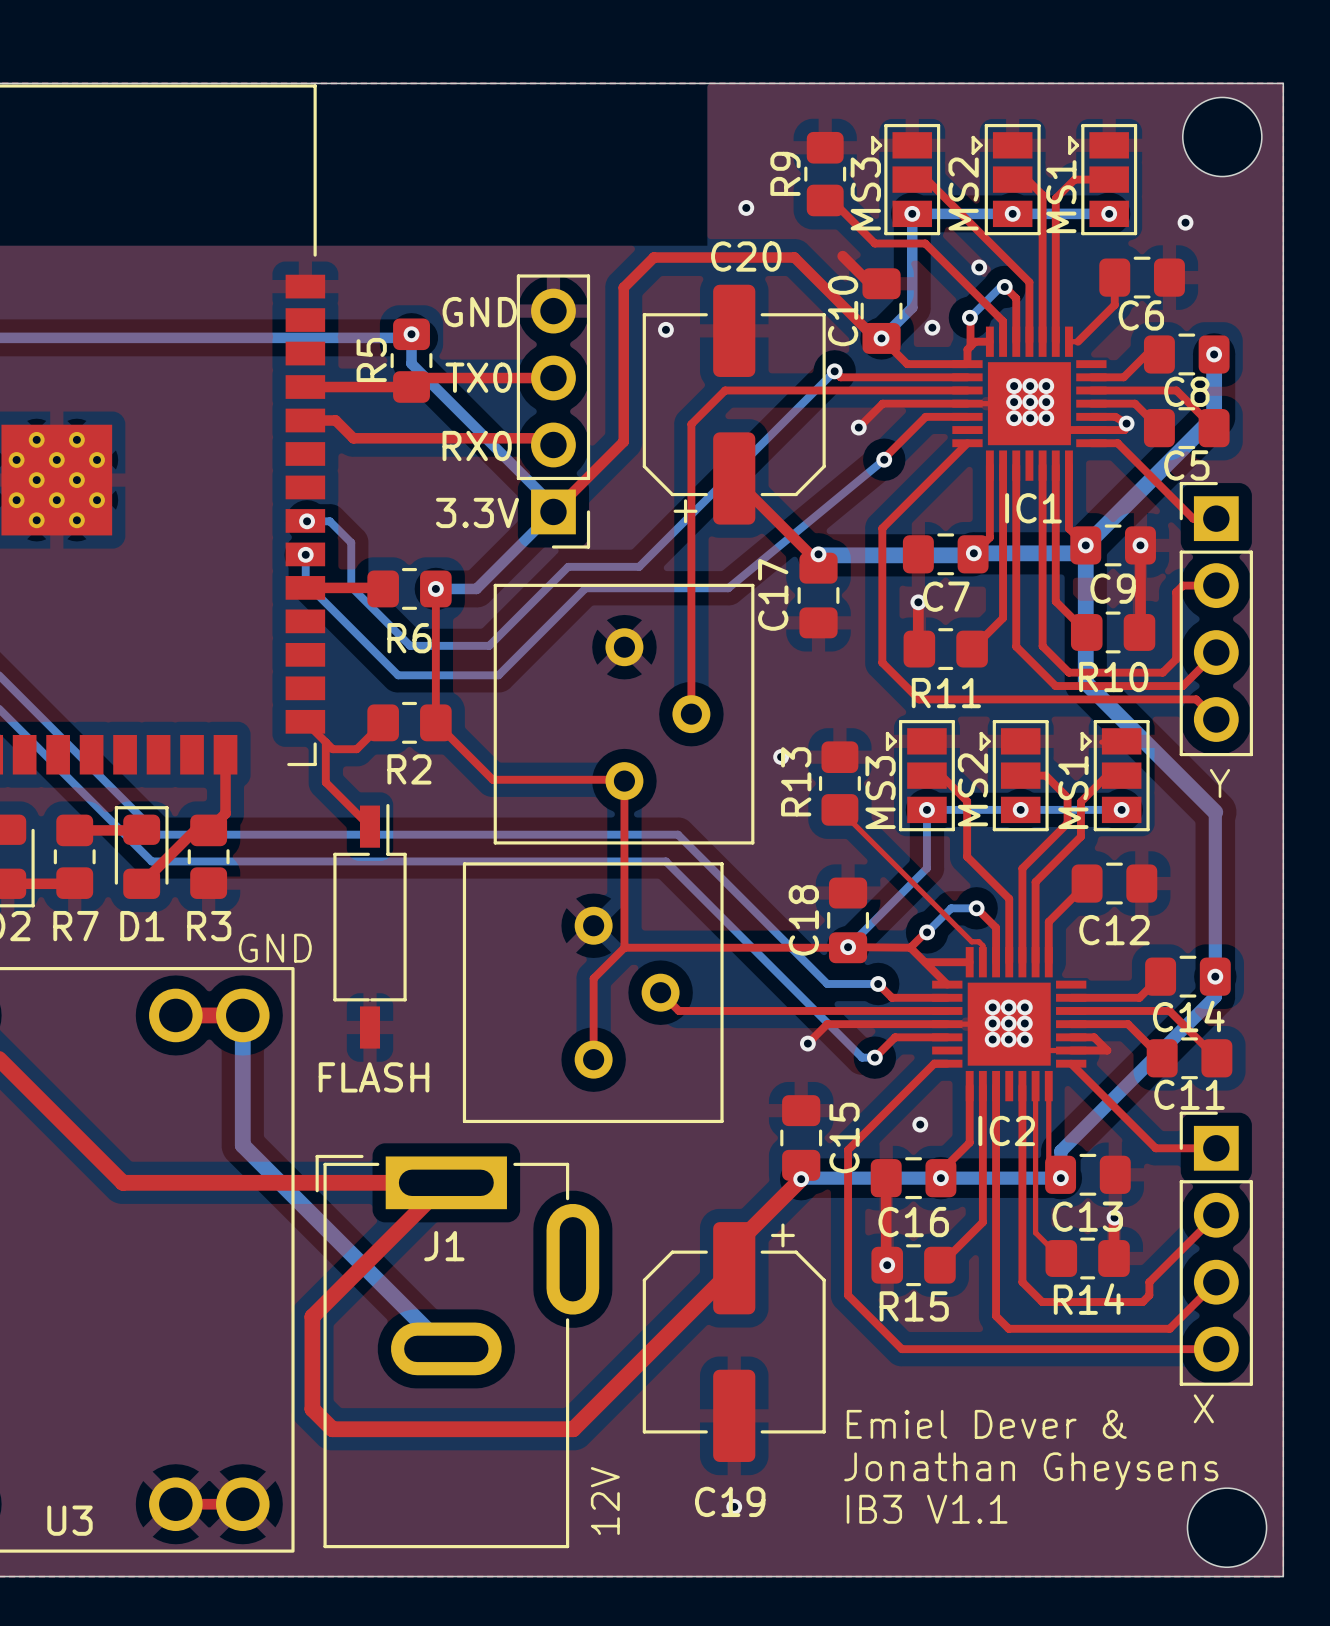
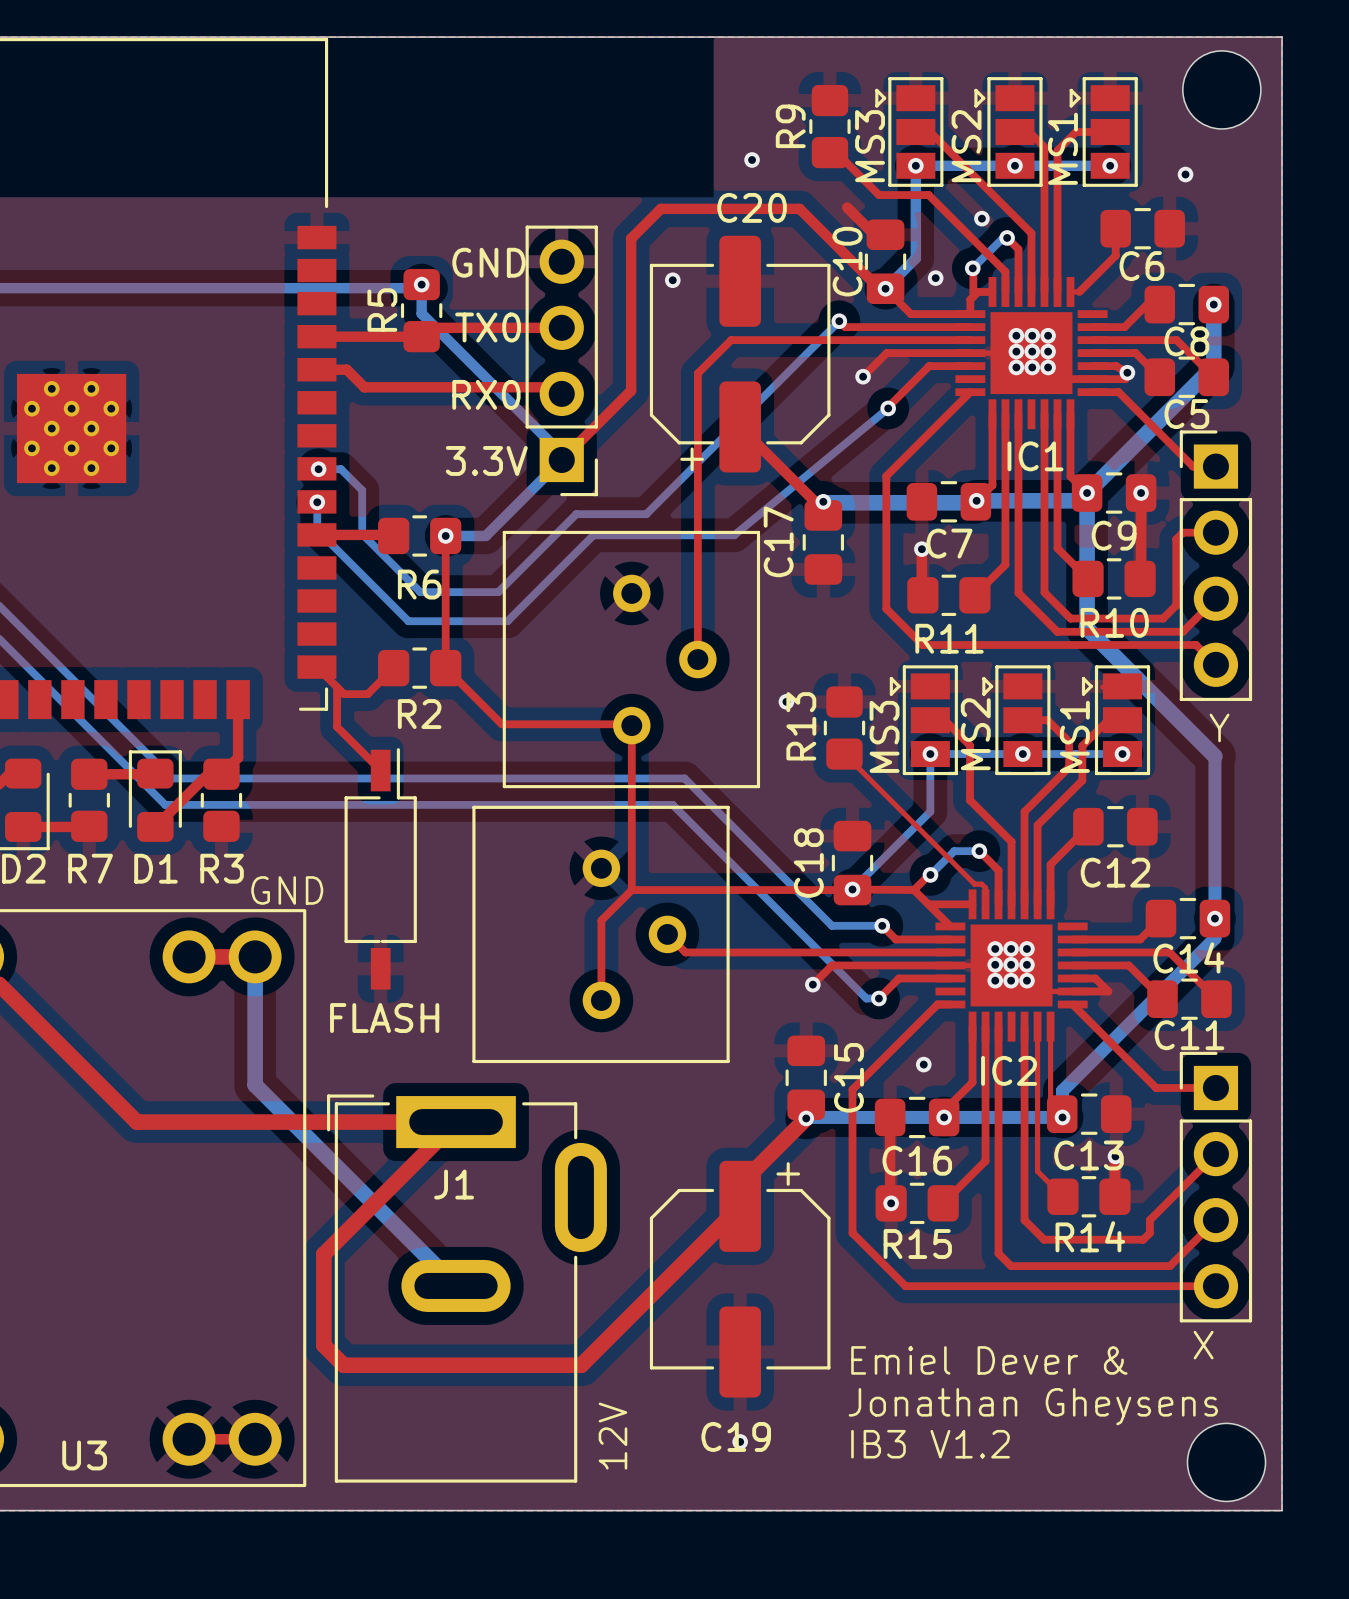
text: IB3 V1.1 (927, 1509) -> IB3 V1.2 (930, 1444)

